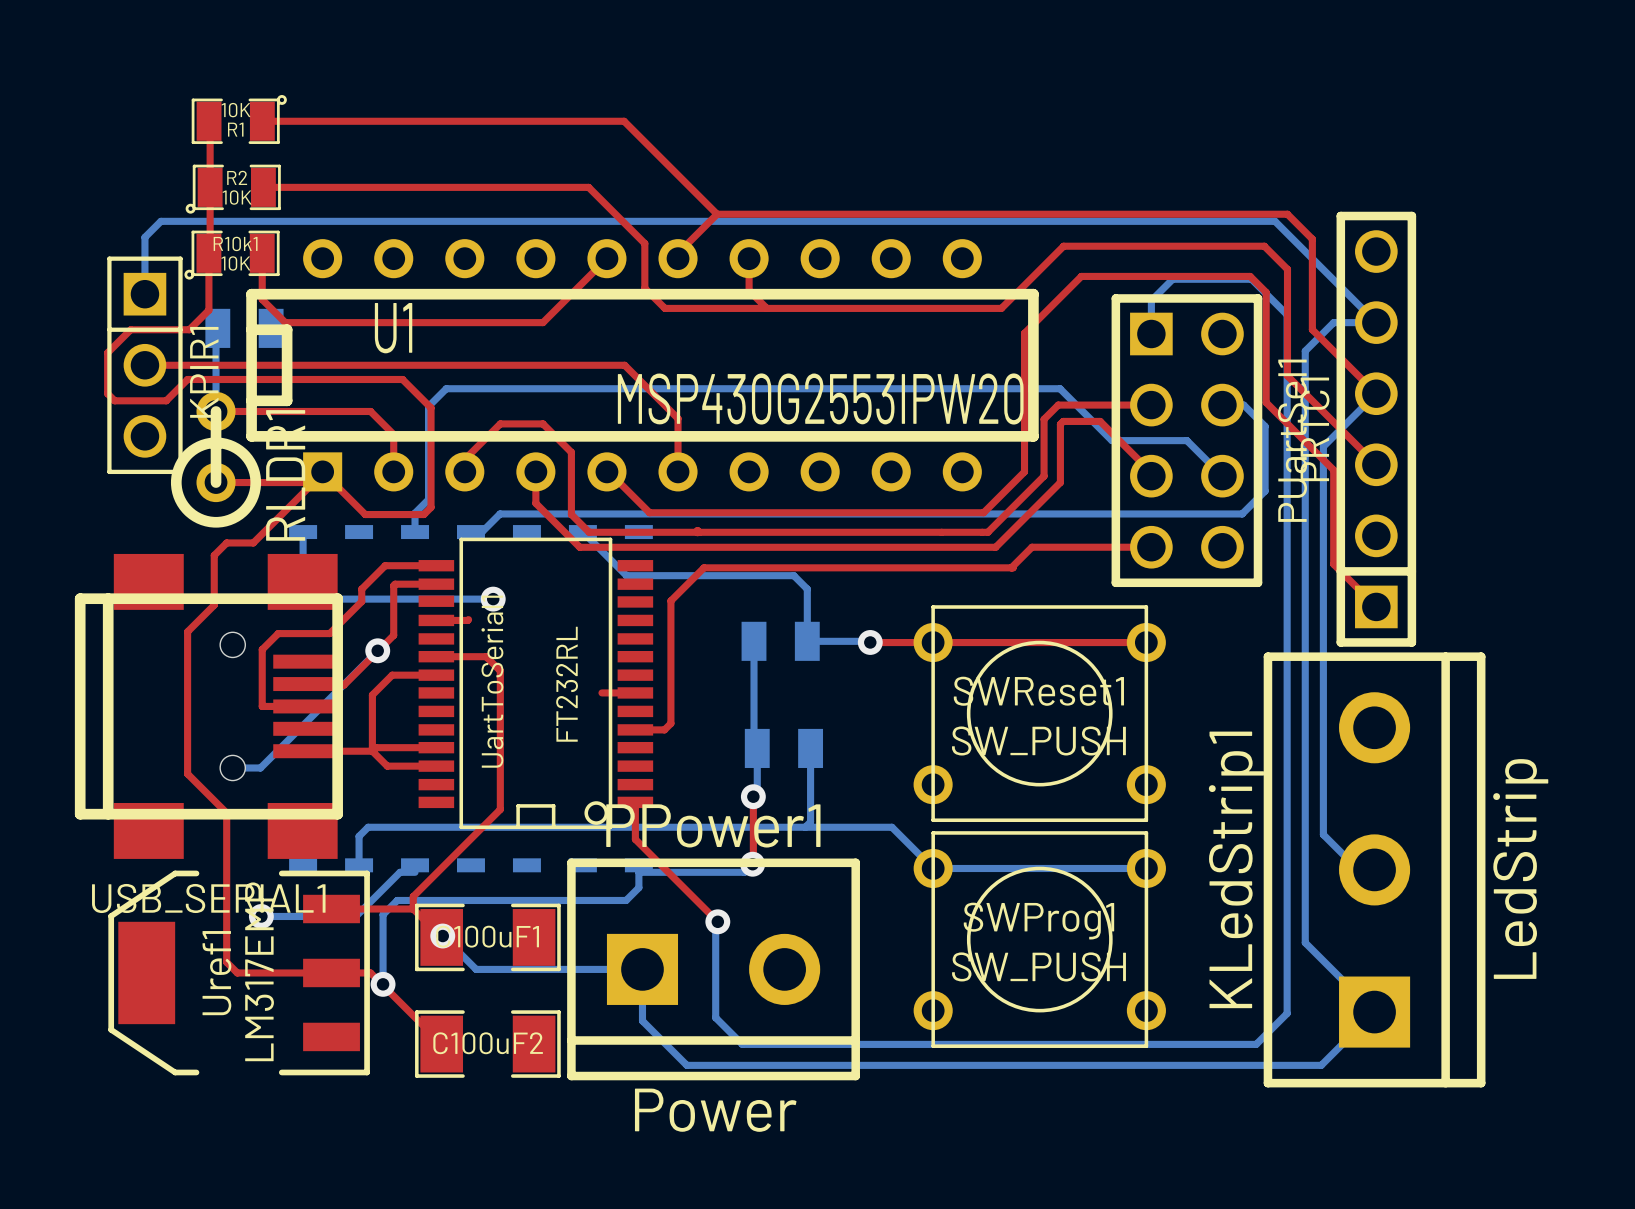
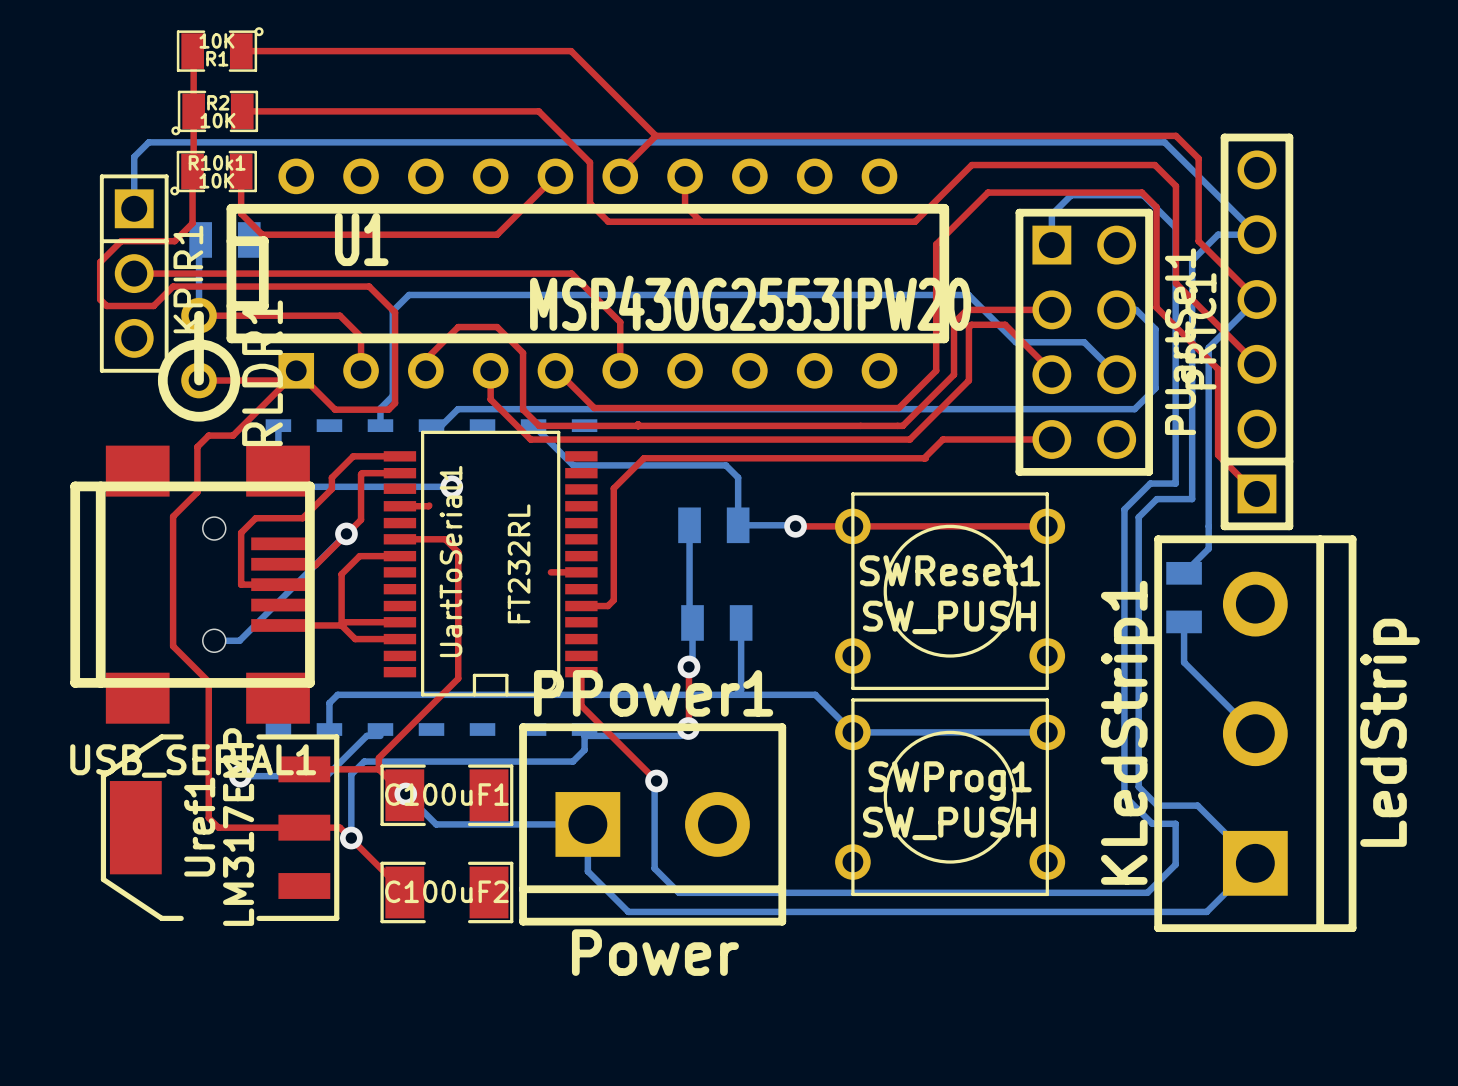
bottom track: (1287, 595) (1287, 968) -> (1175, 483) (1150, 483) (1124, 509) (1124, 795) (1152, 823) (1175, 823)
bottom track: (1305, 612) (1305, 942) (1311, 948) -> (1192, 499) (1156, 499) (1138, 517) (1138, 786) (1157, 805) (1197, 805)
bottom track: (1323, 666) (1323, 834) (1358, 869) (1374, 869) -> (1184, 621) (1184, 662) (1255, 733)
bottom track: none -> (1208, 548) (1184, 573)
part: none -> (1184, 597)

